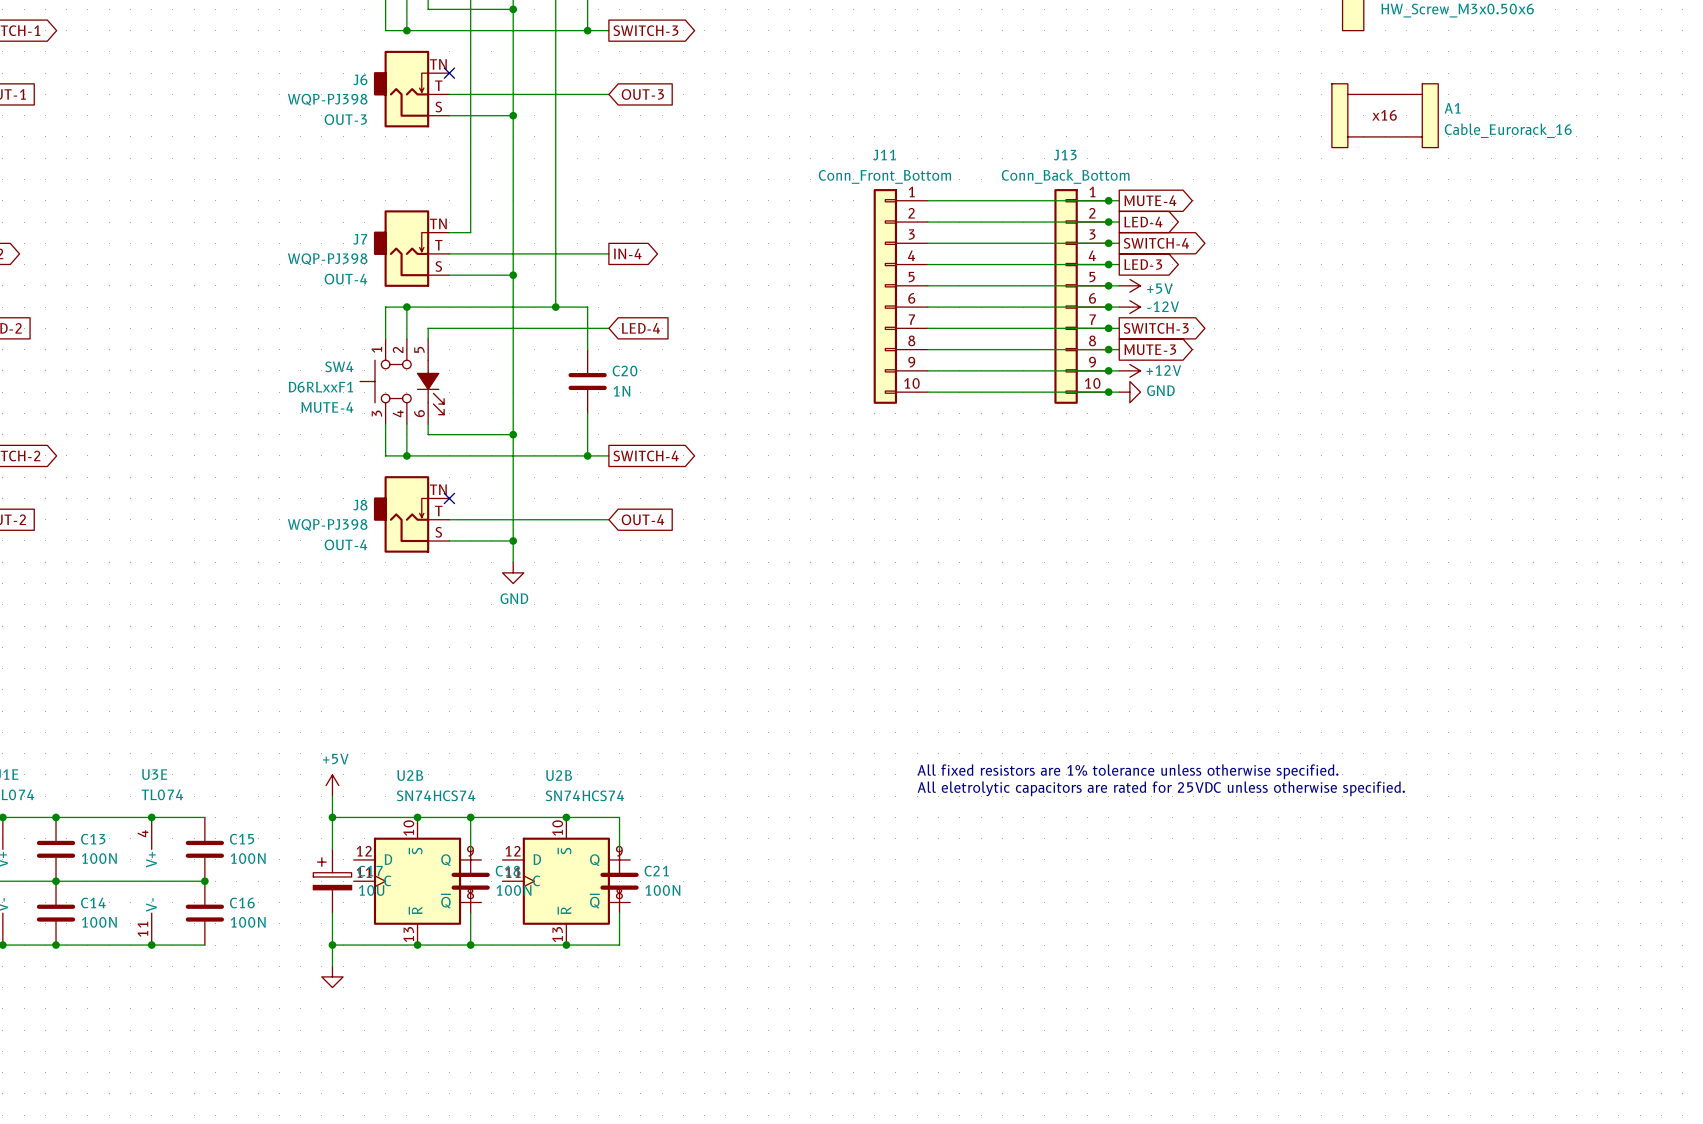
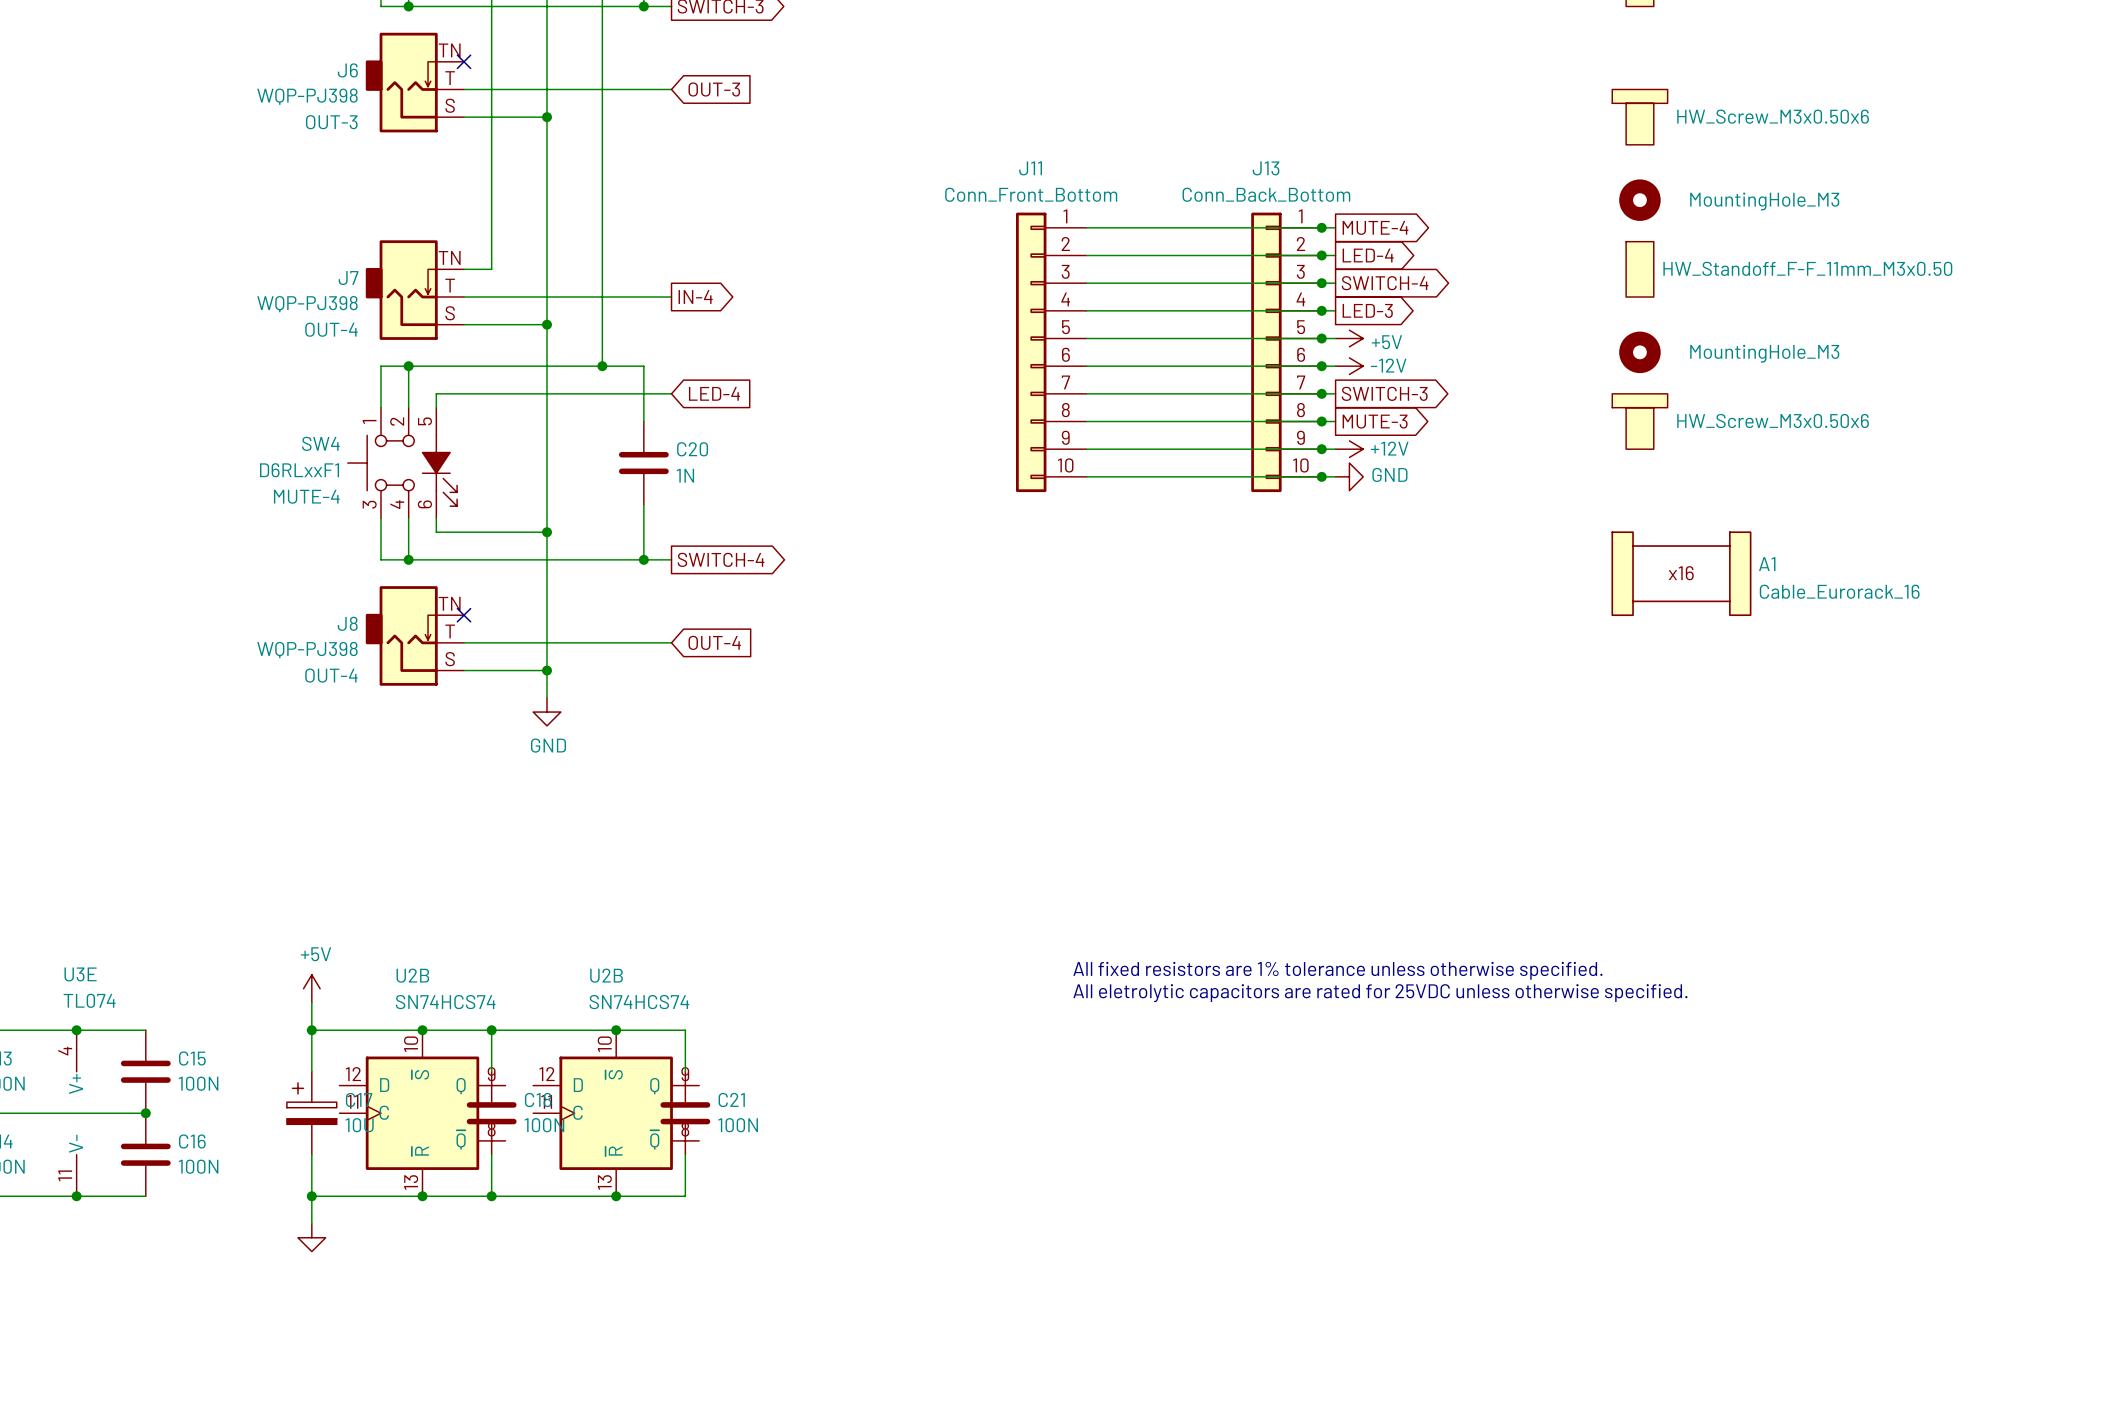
part: none -> HW_Screw_M3x0.50x6 (1639, 117)
A1 position: (1385, 115) -> (1681, 573)
part: none -> MountingHole_M3 (1639, 200)
part: none -> HW_Standoff_F-F_11mm_M3x0.50 (1639, 269)
part: none -> MountingHole_M3 (1639, 352)
part: none -> HW_Screw_M3x0.50x6 (1639, 421)

